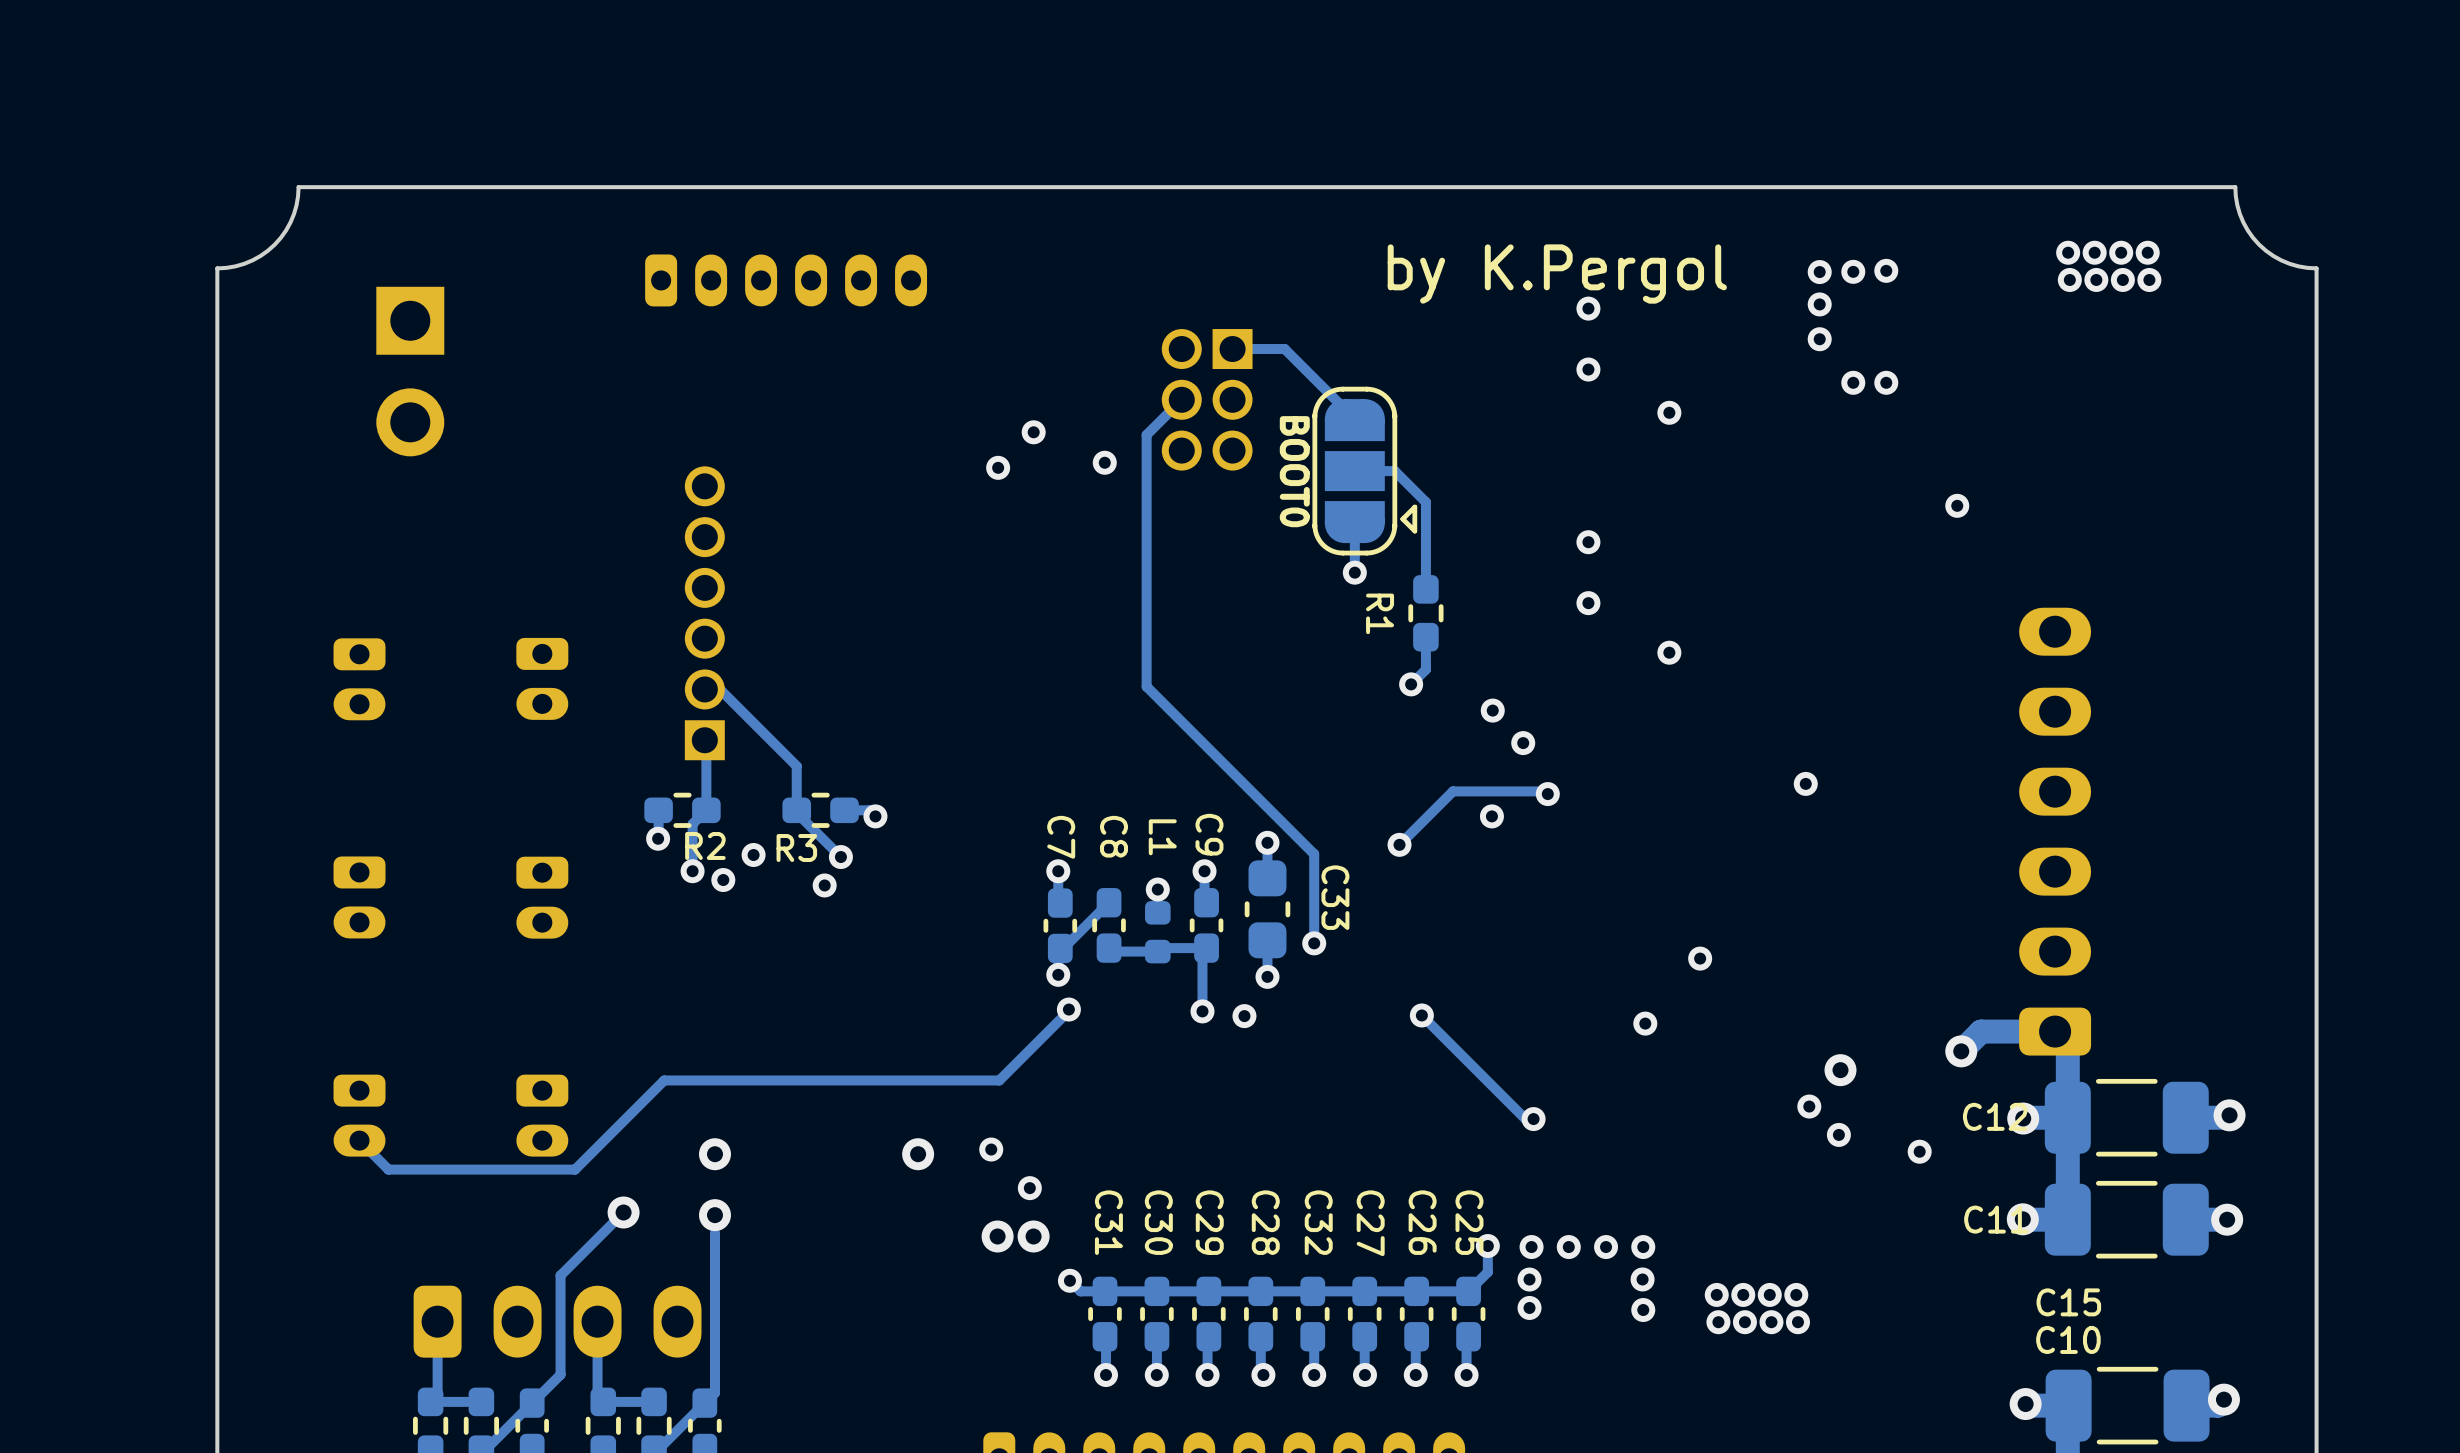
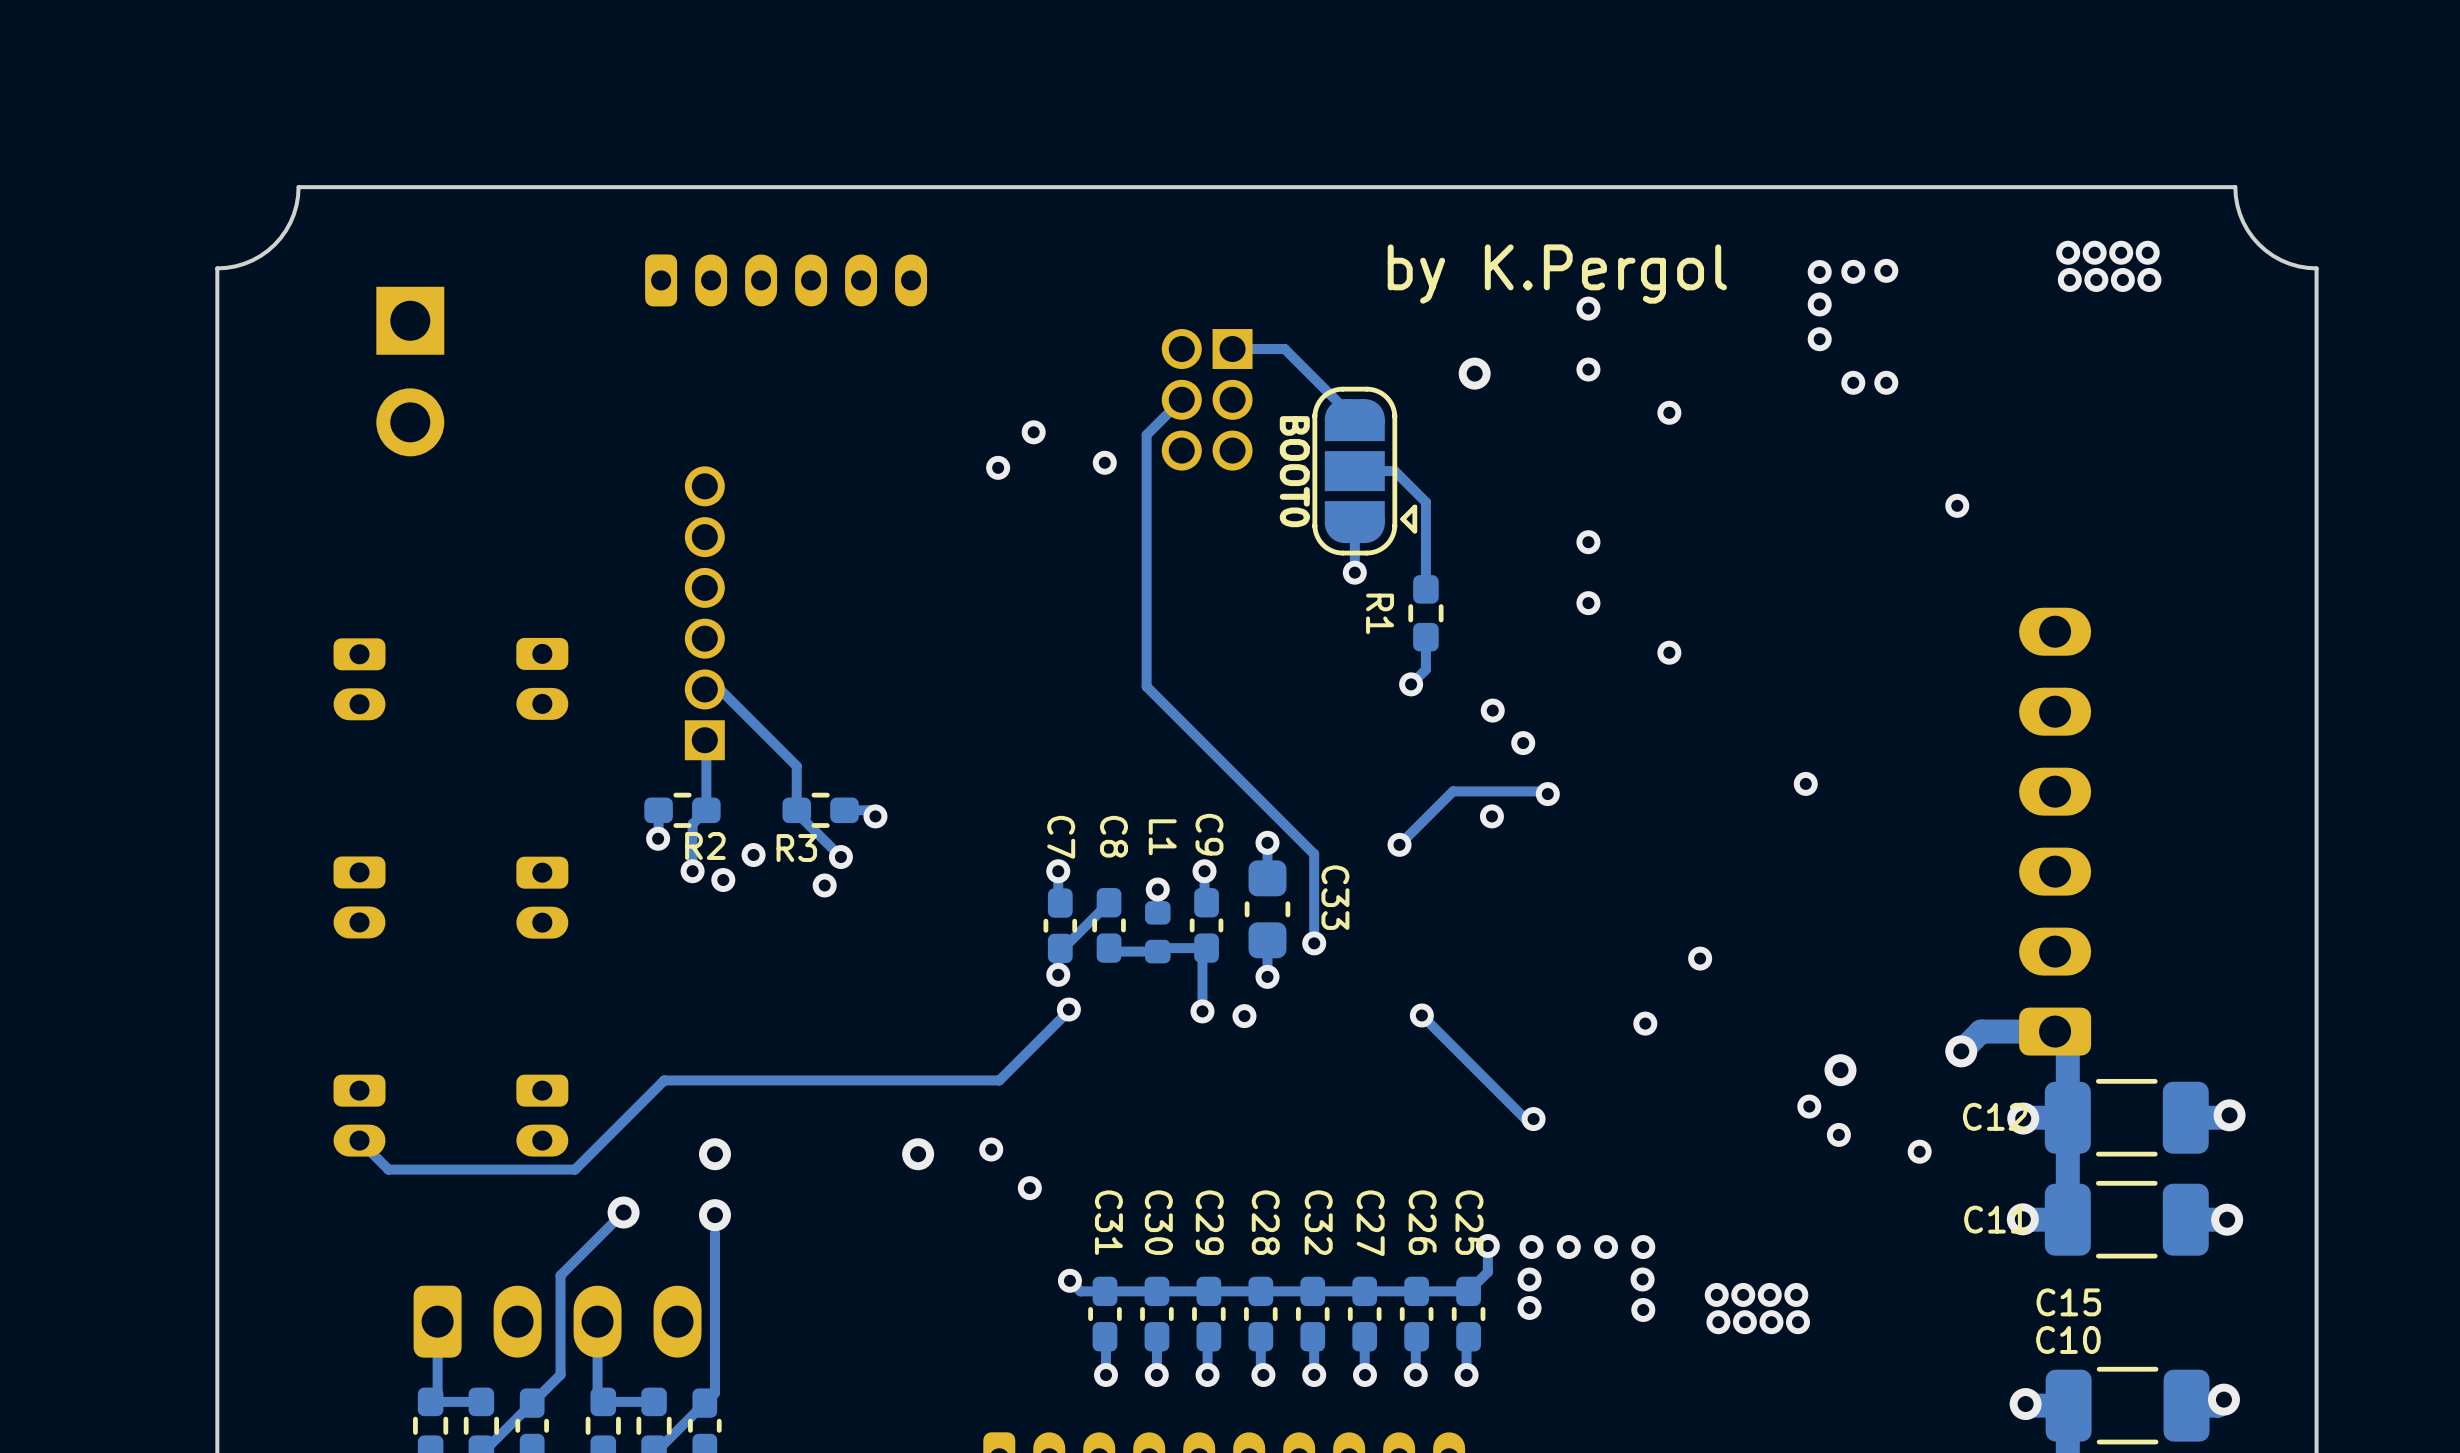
via: none -> (1474, 373)
via: (997, 1236) -> none
via: (1033, 1236) -> none

